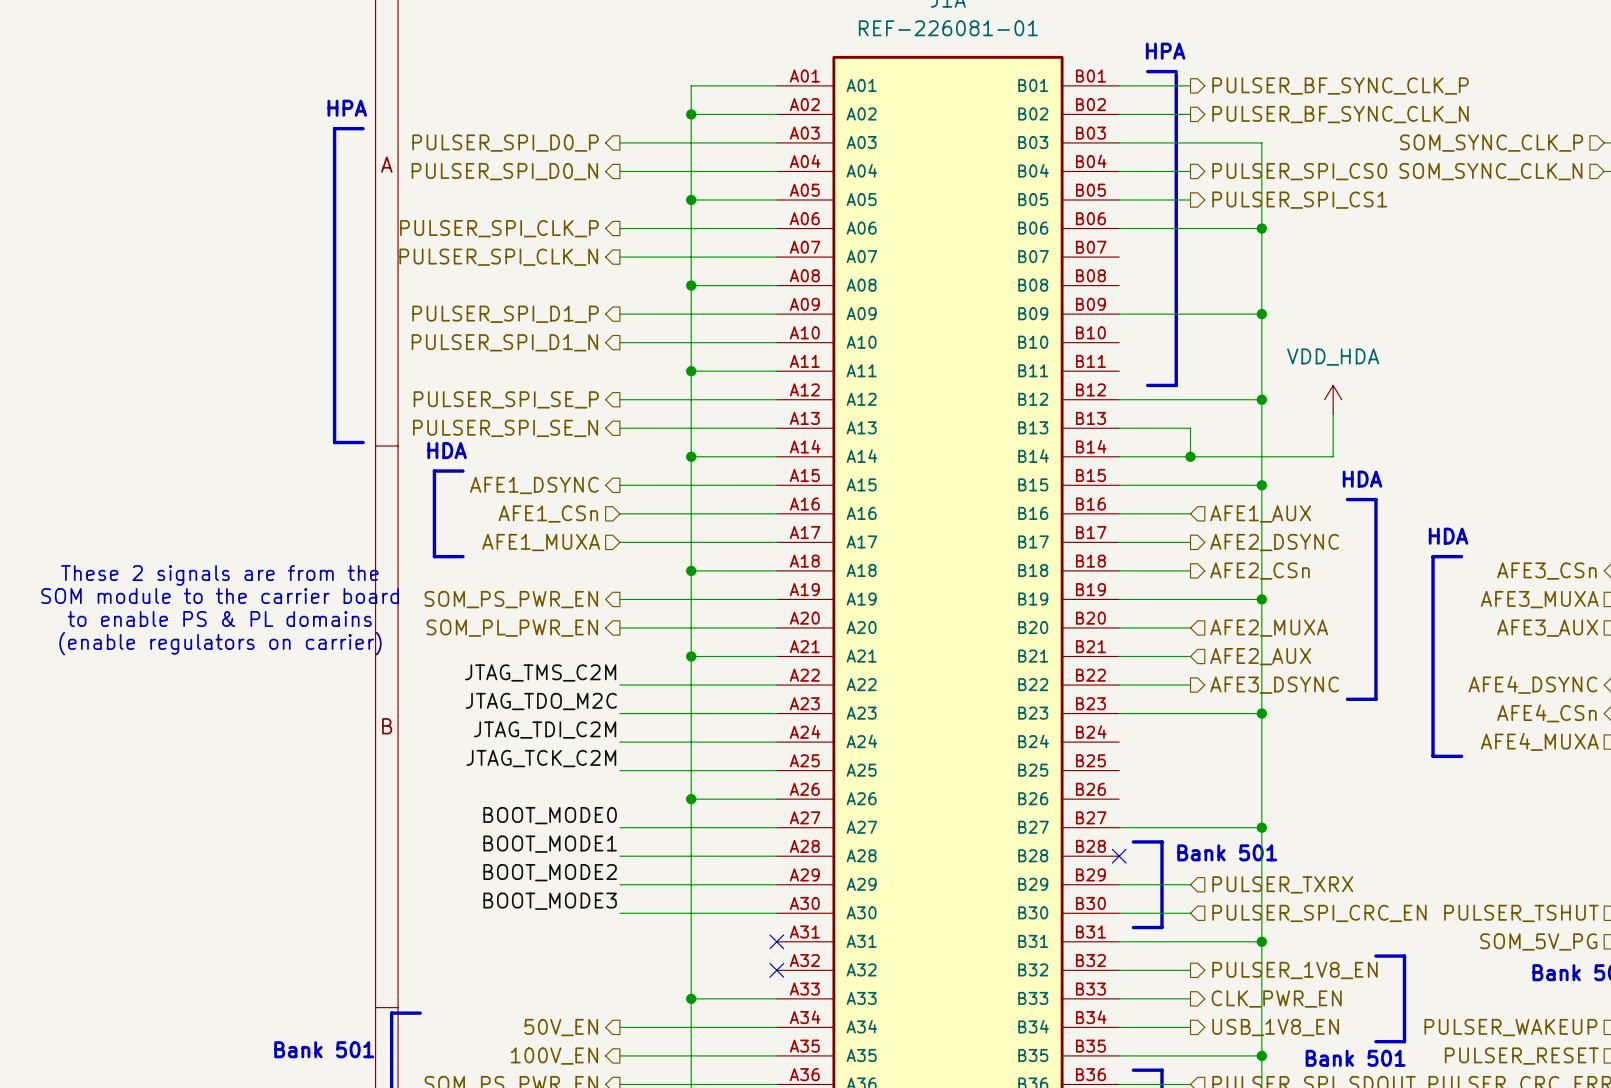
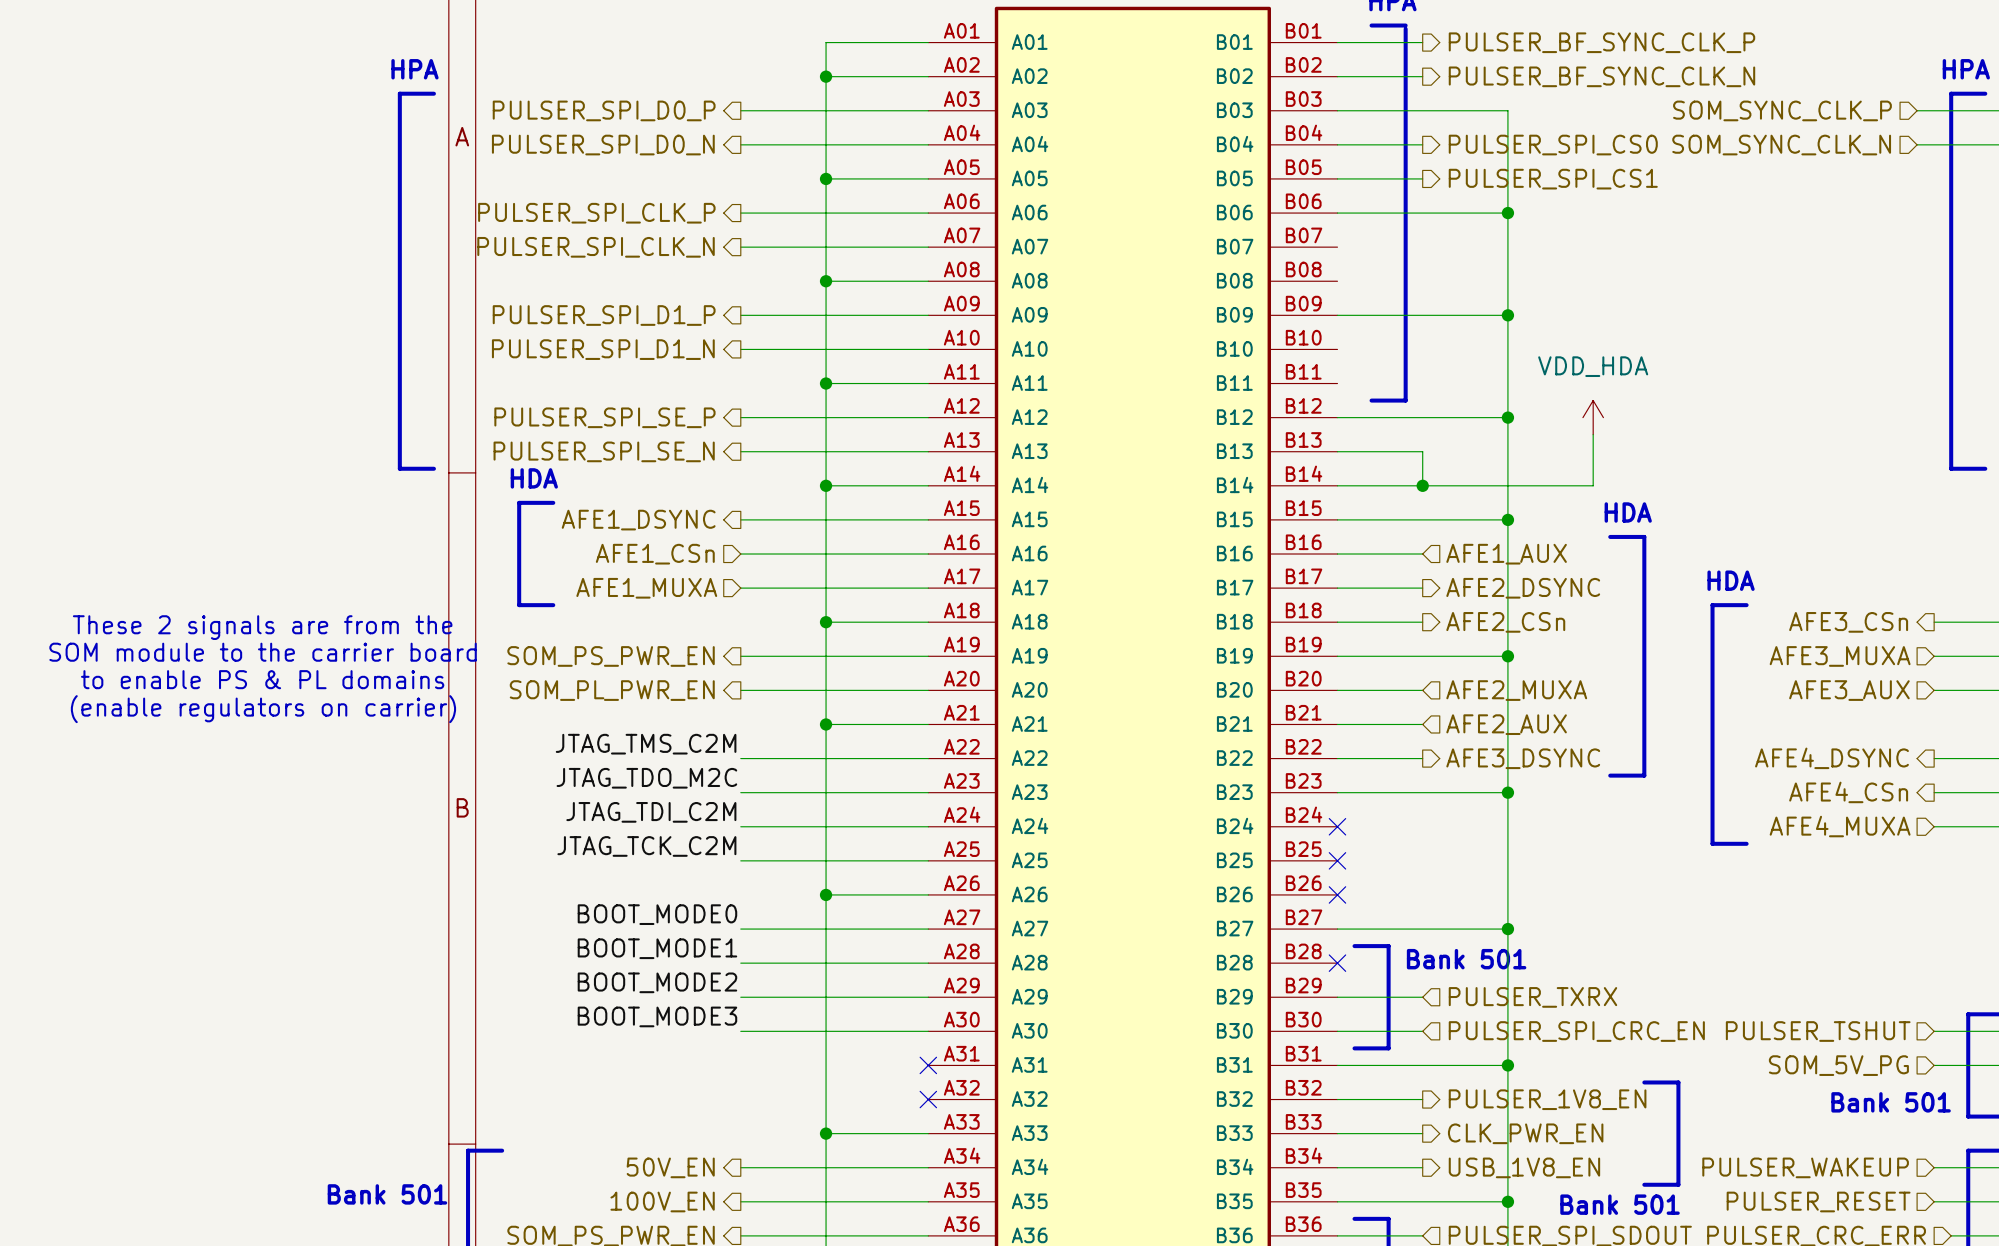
no-connect mark: none -> (1337, 826)
no-connect mark: none -> (1337, 860)
no-connect mark: none -> (1337, 894)

